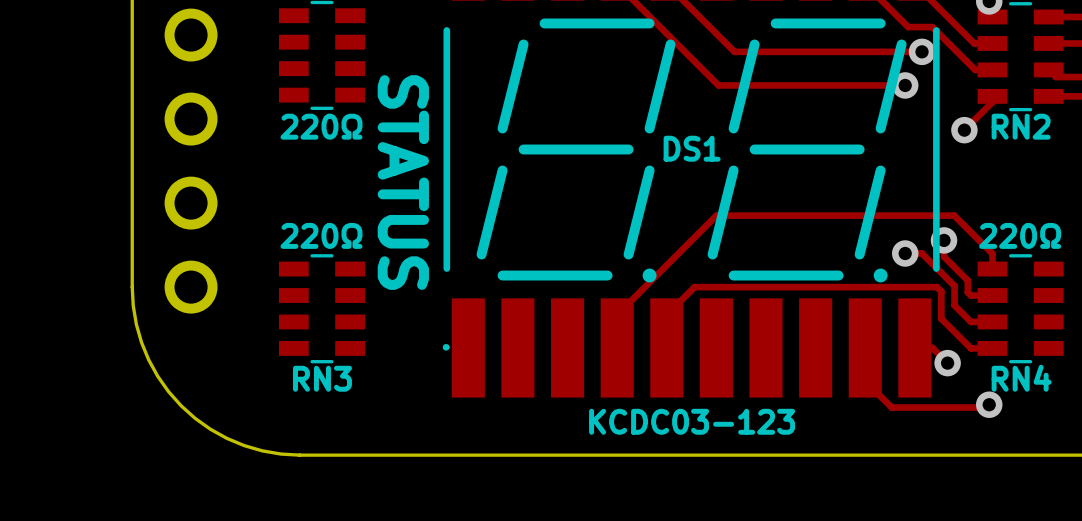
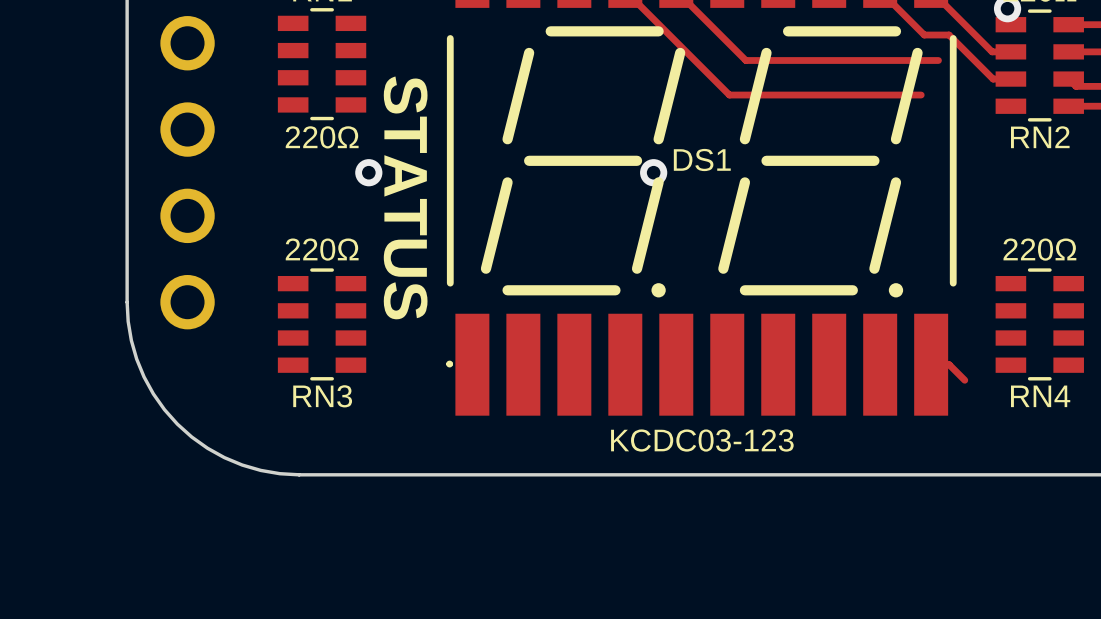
via: (922, 51) -> none
via: (905, 85) -> none
track: (992, 96) (992, 102) (964, 130) -> none
via: (964, 130) -> none
via: none -> (368, 172)
via: none -> (653, 172)
track: (944, 240) (944, 256) (967, 280) (967, 292) (971, 295) (992, 295) -> none
via: (944, 240) -> none
track: (905, 253) (922, 253) (954, 286) (954, 305) (971, 321) (992, 321) -> none
via: (905, 253) -> none
track: (992, 269) (992, 253) (954, 215) (716, 215) (617, 314) -> none
track: (666, 314) (694, 287) (936, 287) (941, 291) (941, 318) (971, 348) (992, 348) -> none
via: (947, 363) -> none
track: (865, 381) (891, 407) (986, 407) (989, 404) -> none
via: (989, 404) -> none

